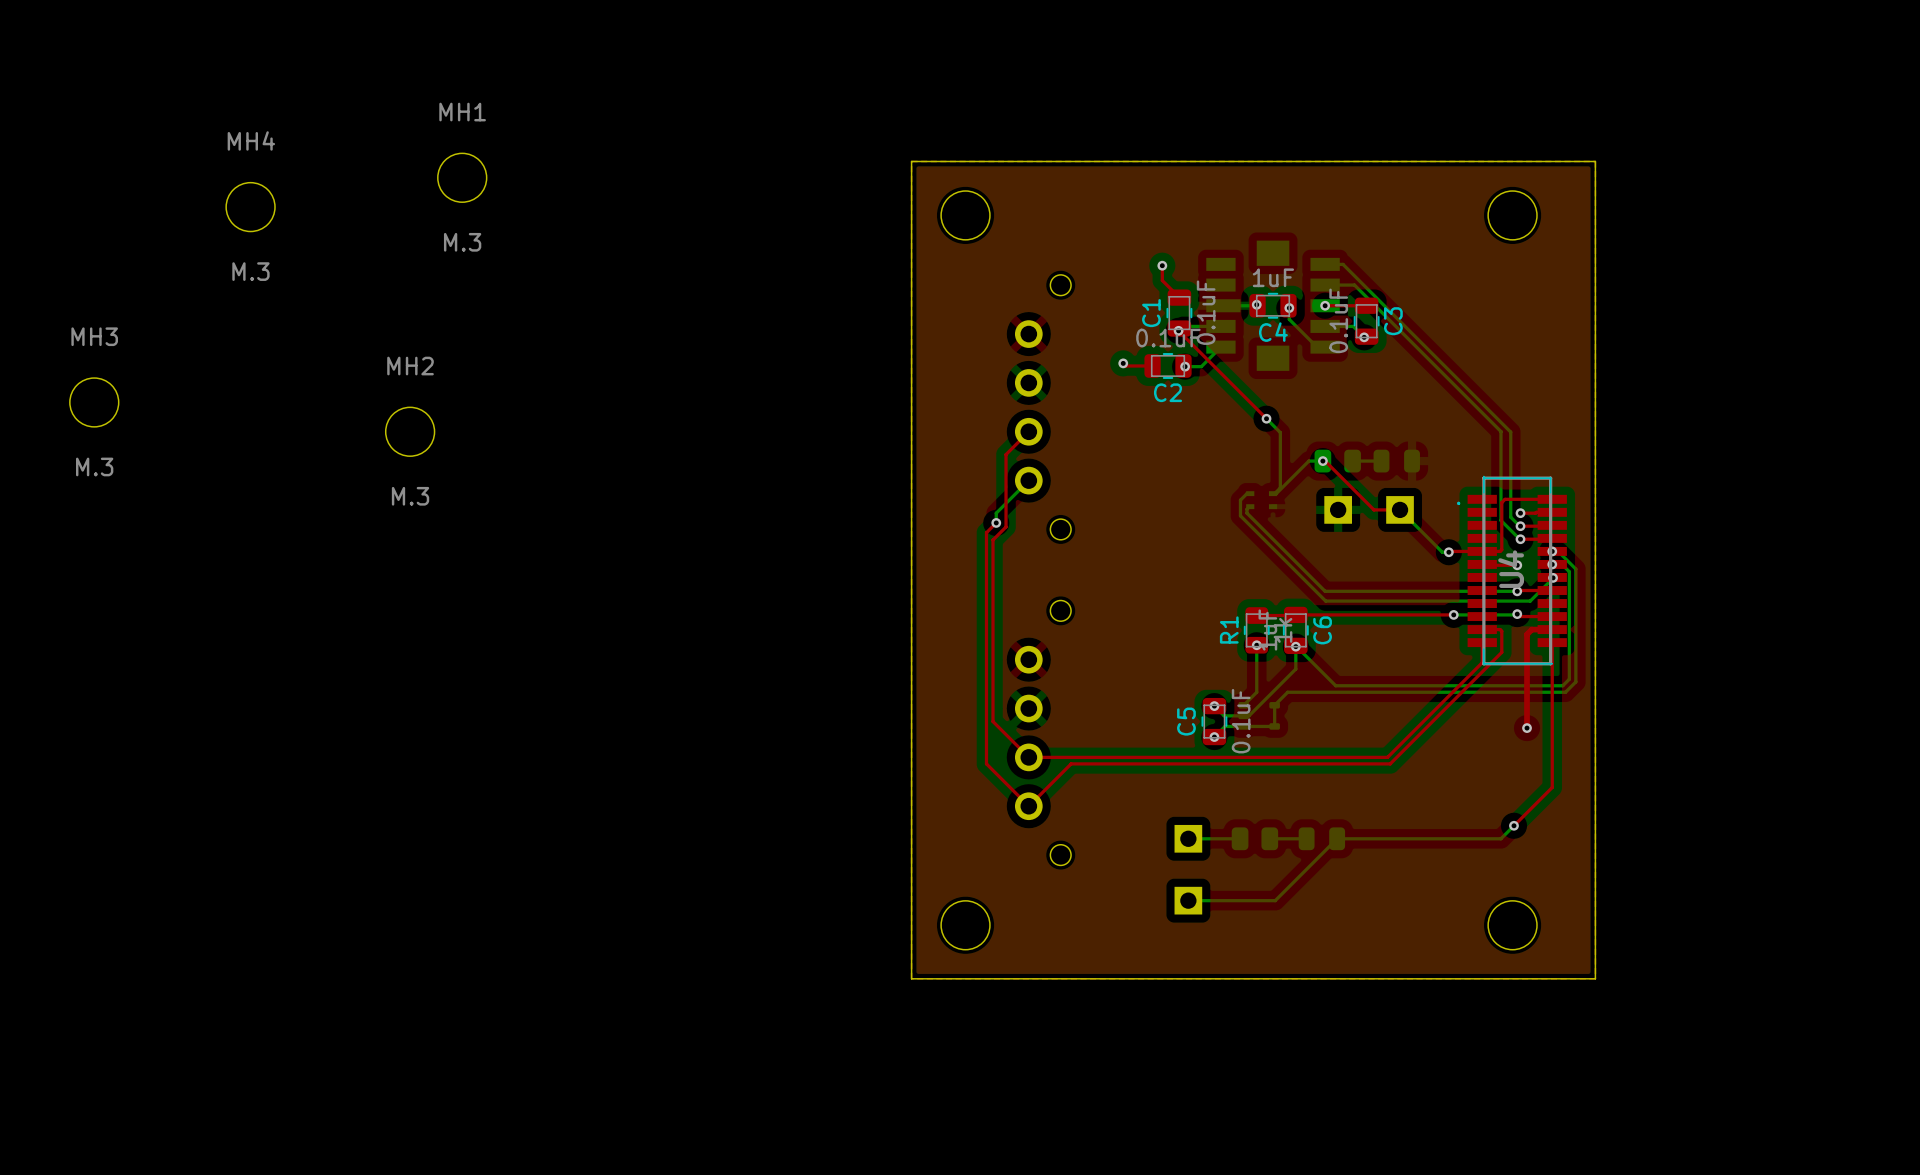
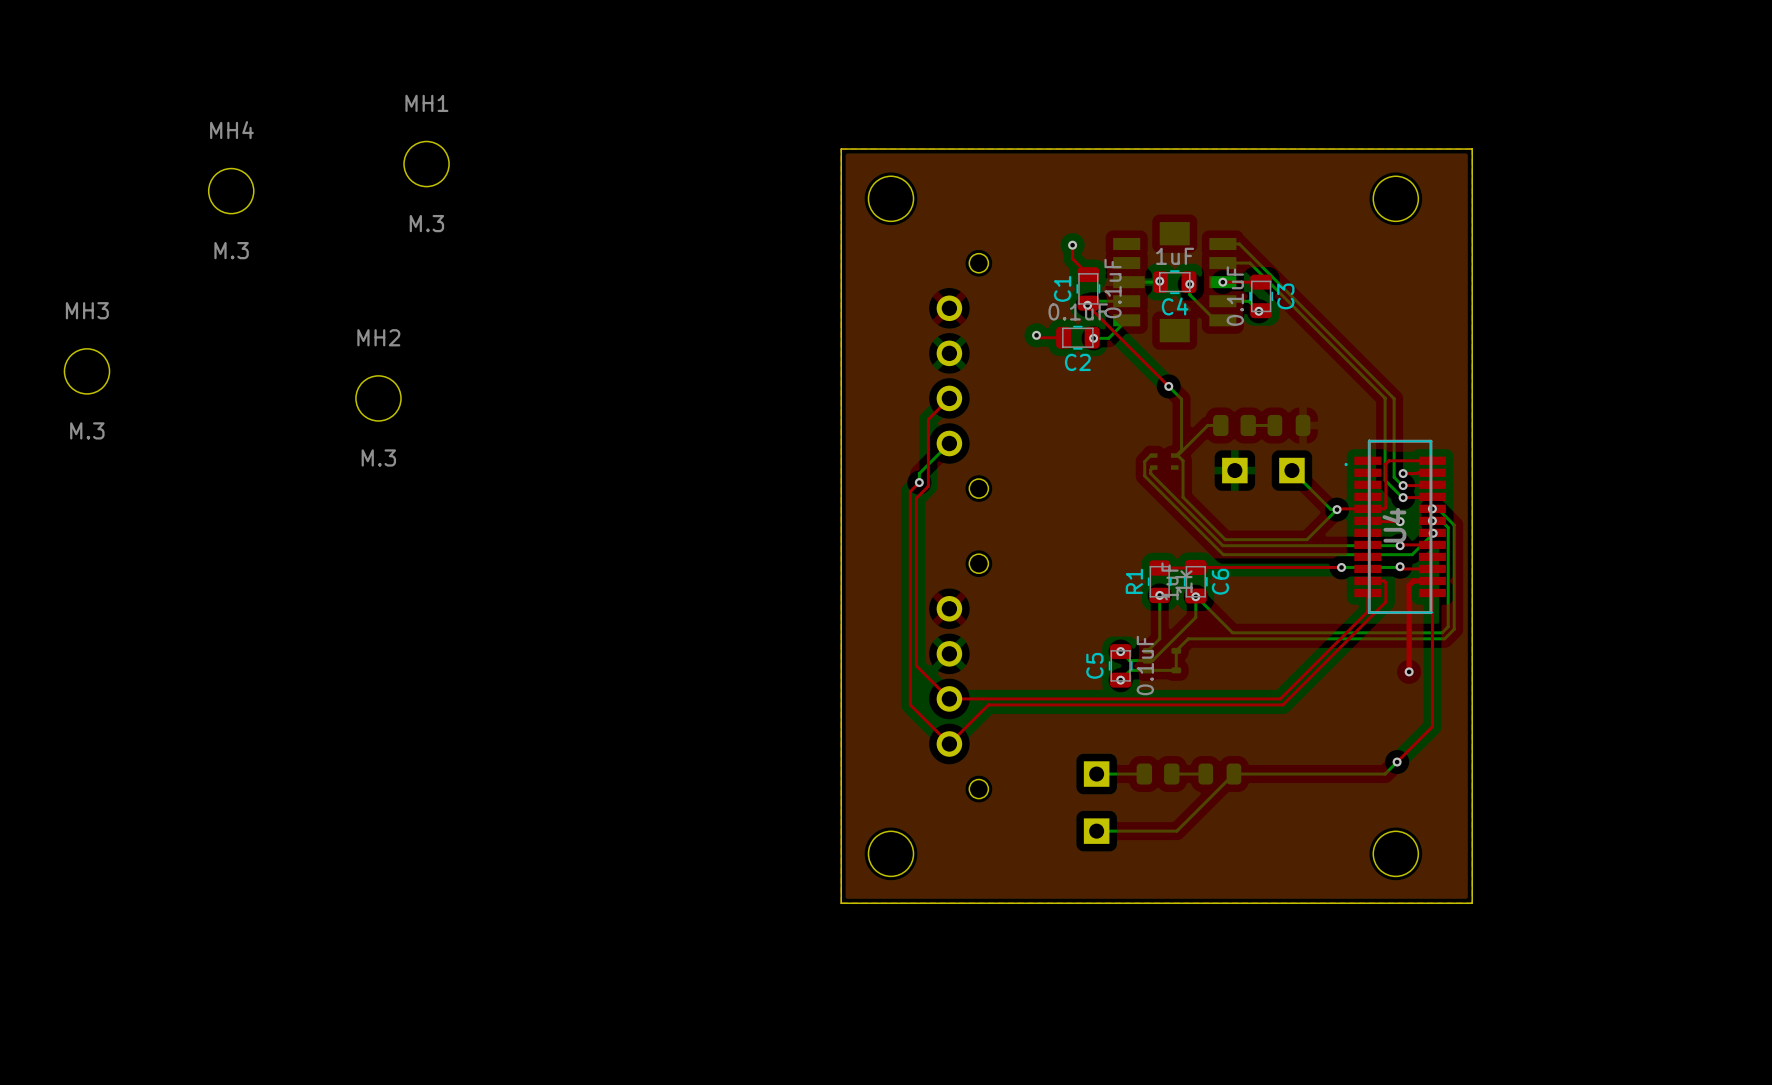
top track: (1322, 461) (1323, 459) (1373, 509) (1400, 509) -> none
via: (1322, 461) -> none
bottom track: none -> (1177, 455) (1183, 460) (1183, 497) (1225, 539) (1306, 539) (1337, 509)

